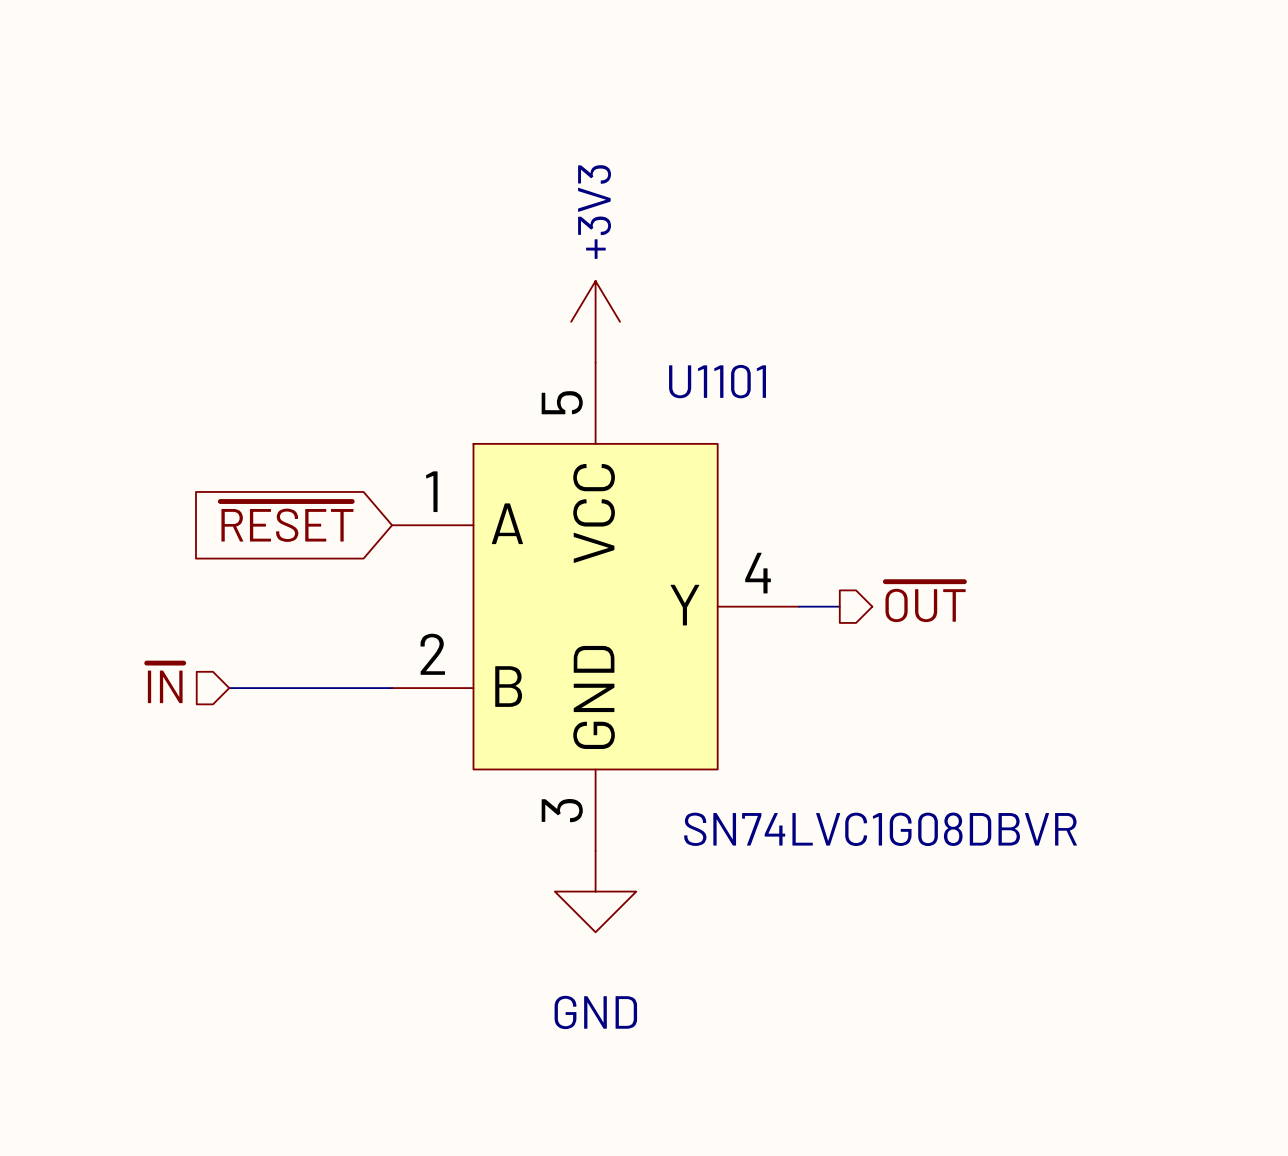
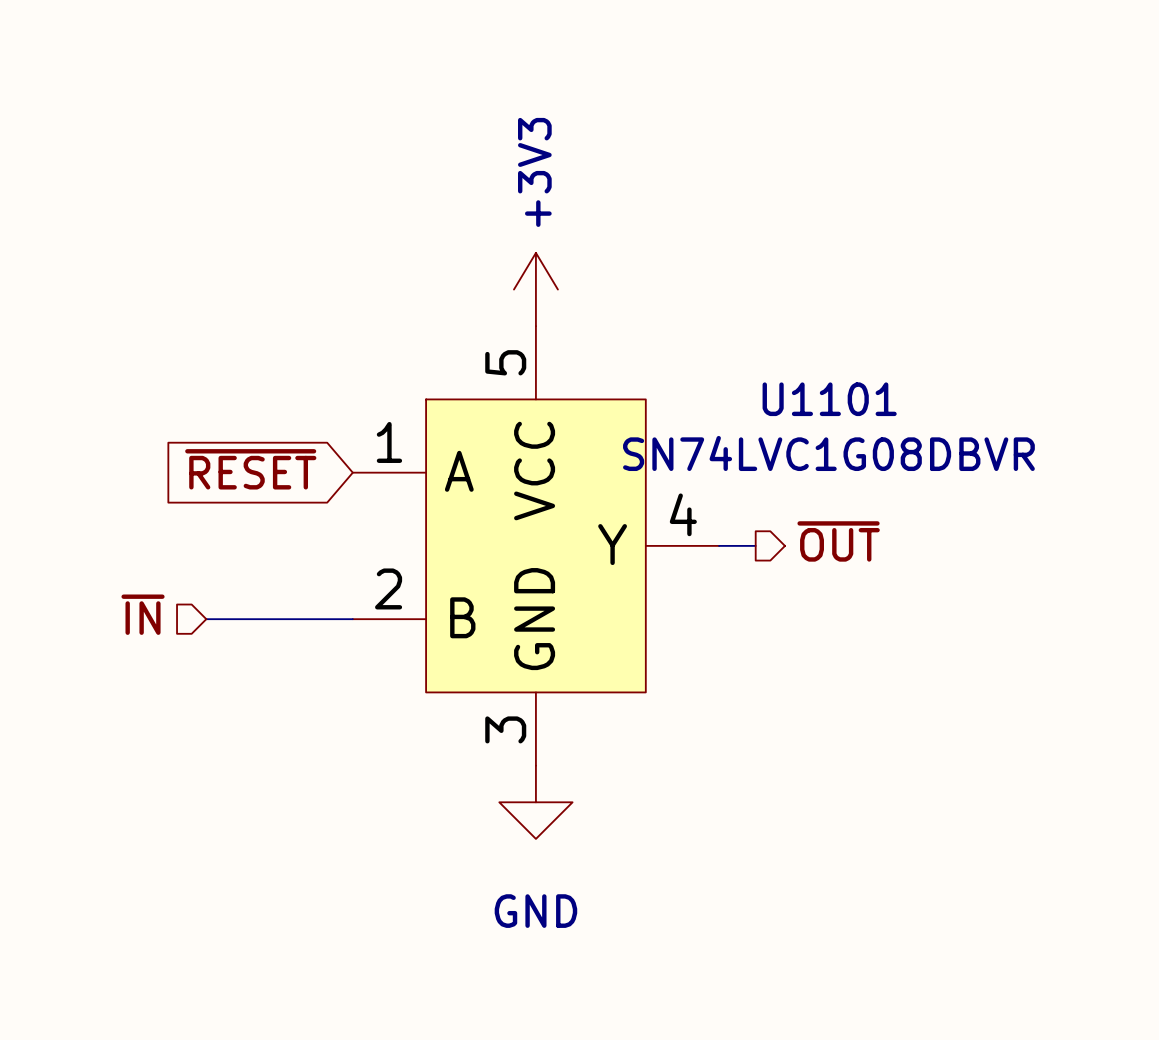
U1101 name position: U1101 (717, 381) -> U1101 (829, 399)
U1101 value position: SN74LVC1G08DBVR (880, 829) -> SN74LVC1G08DBVR (828, 453)

